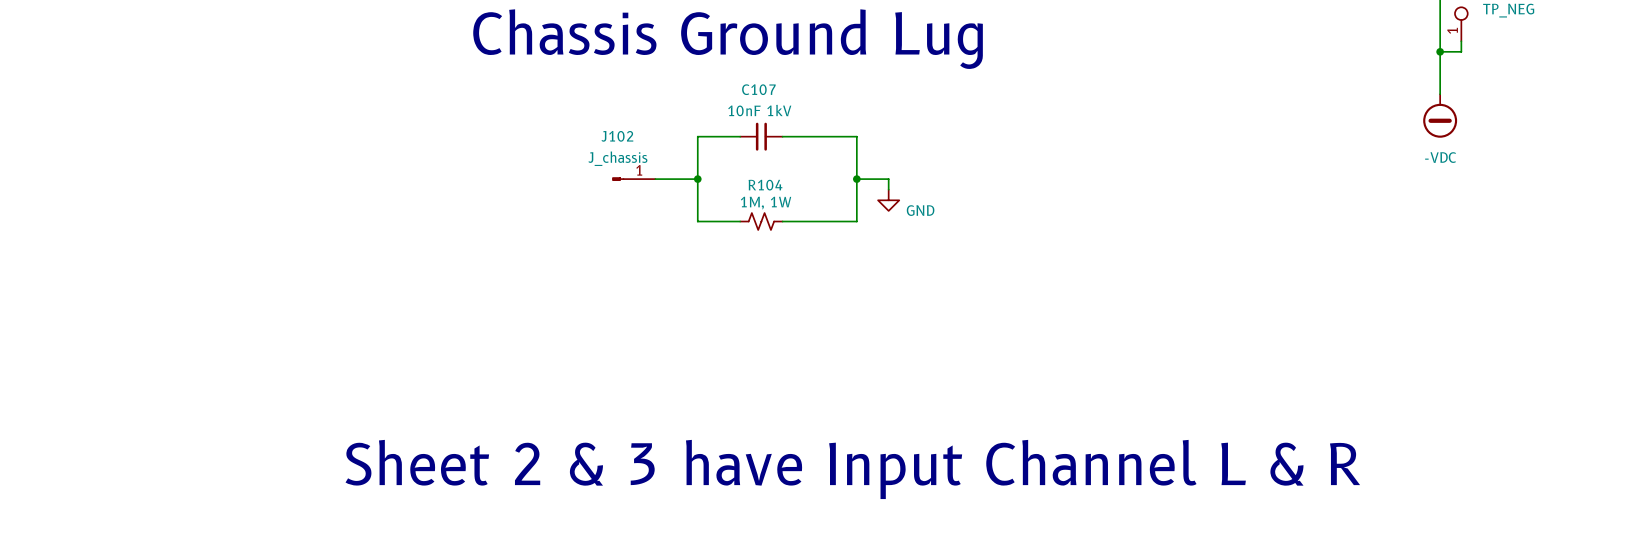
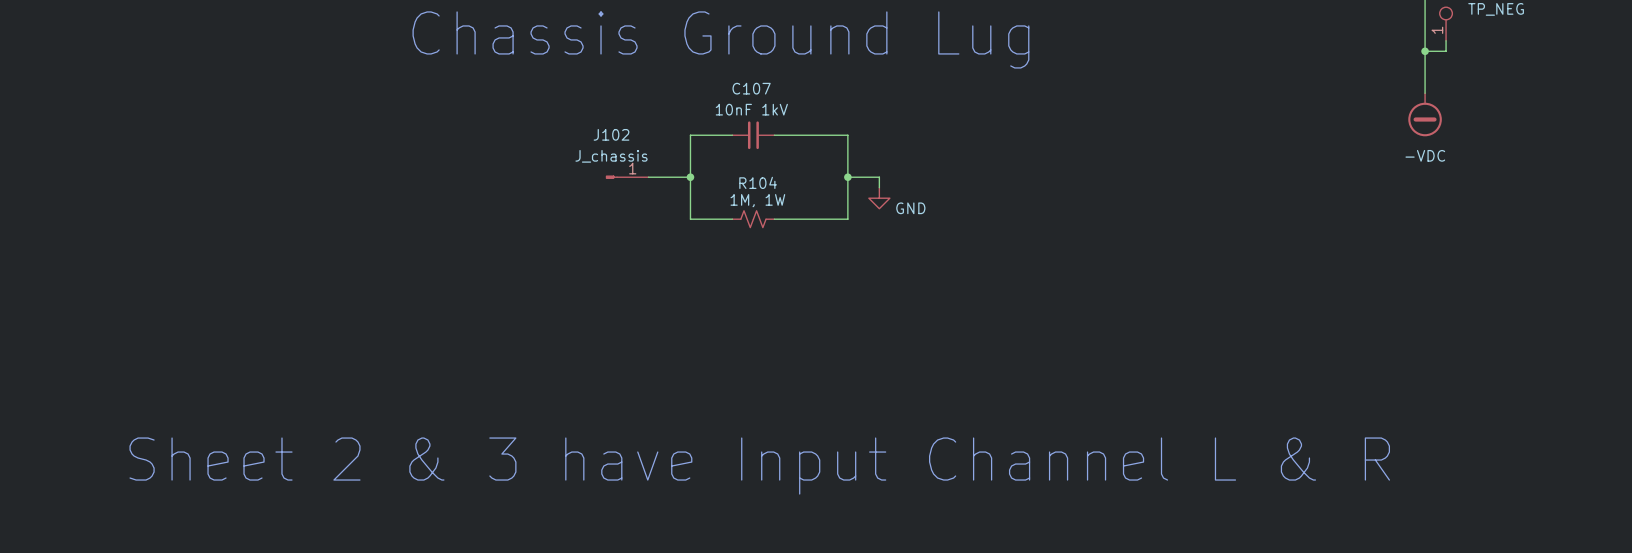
text position: Sheet 2 & 3 have Input Channel L & R (852, 469) -> Sheet 2 & 3 have Input Channel L & R (759, 466)

